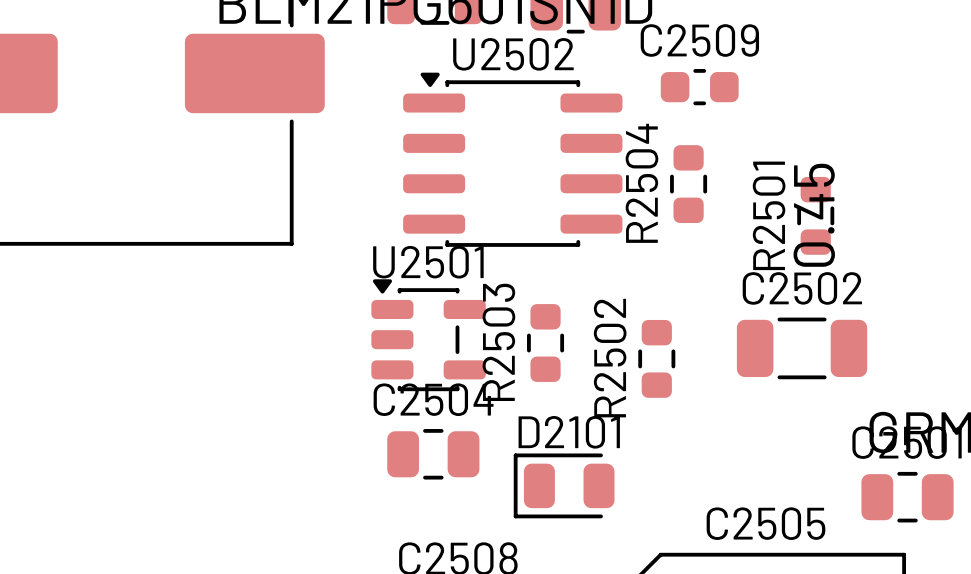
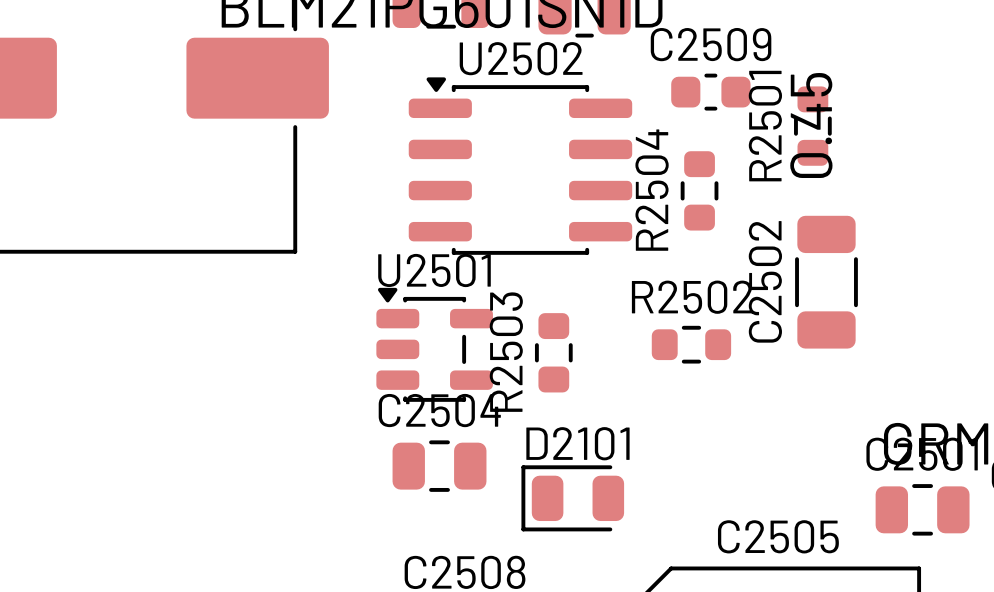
R2501 position: (815, 215) -> (812, 126)
C2502 name position: C2502 (802, 288) -> C2502 (765, 281)
C2502 rotation: 0° (802, 348) -> 90° clockwise (826, 282)
R2502 rotation: 0° (656, 358) -> 90° clockwise (691, 344)

